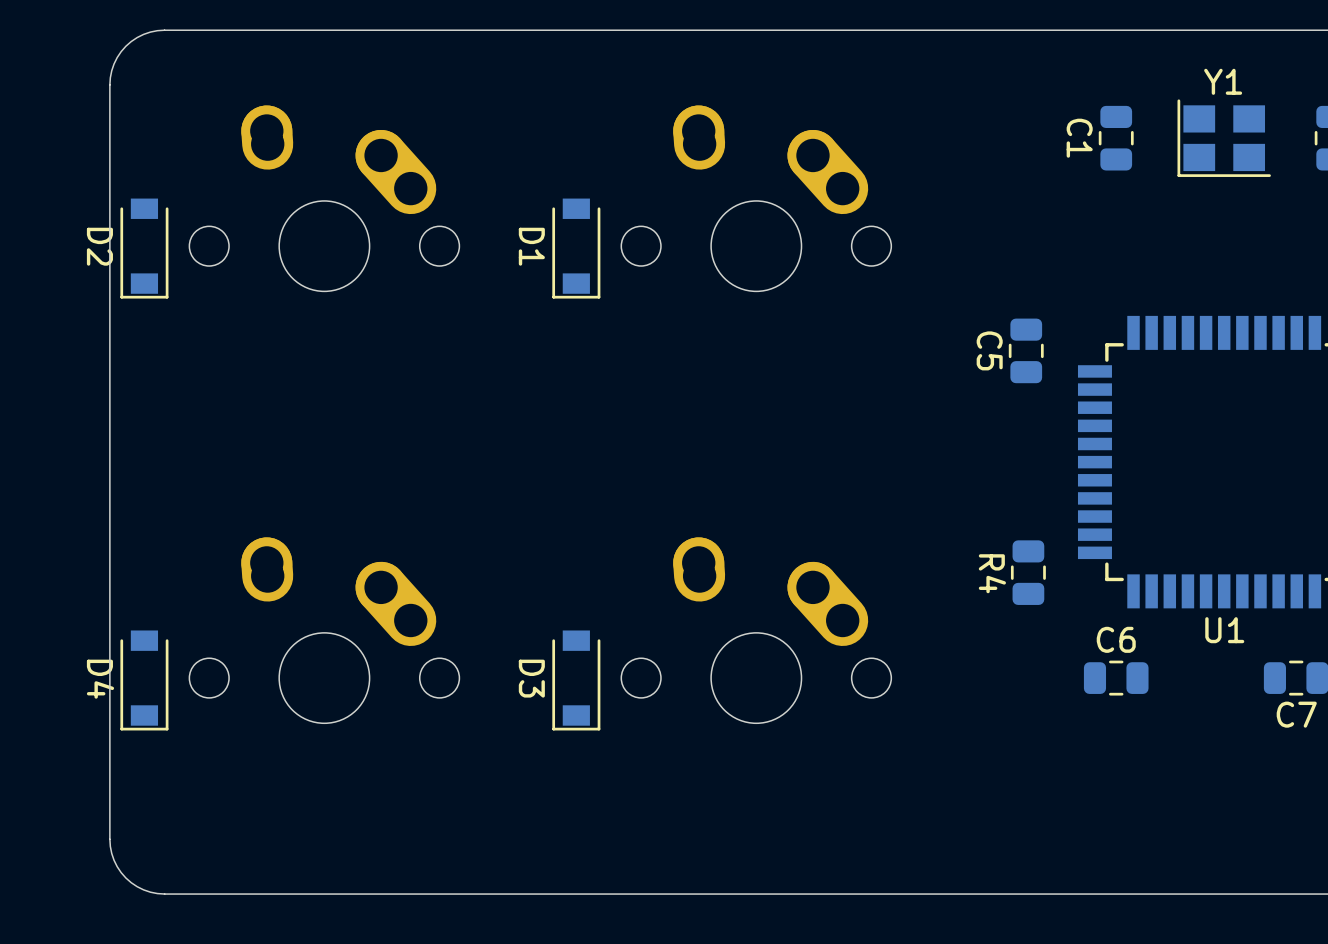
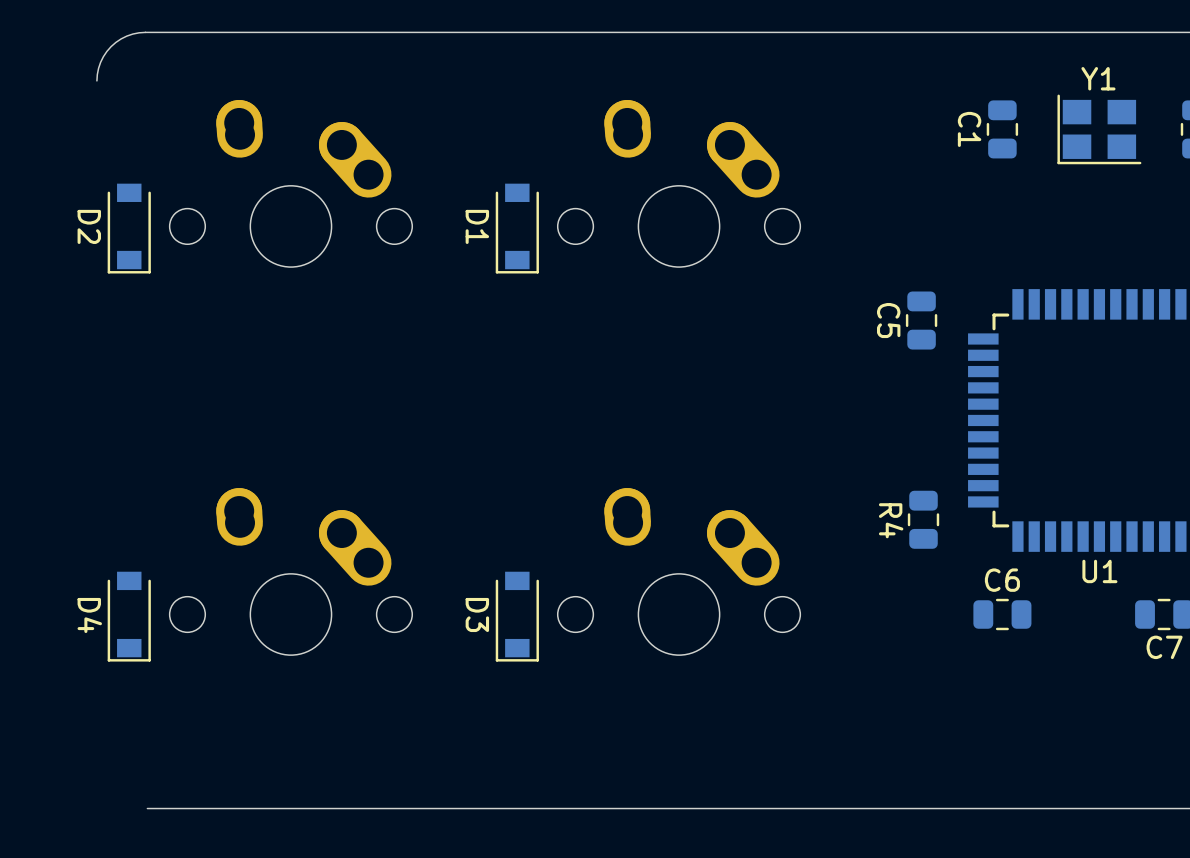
board edge: (164, 30) (143, 34) (125, 46) (114, 63) (109, 84) (110, 846) (117, 866) (131, 882) (143, 889) (164, 894) -> (147, 32) (126, 36) (111, 46) (100, 62) (96, 80)

